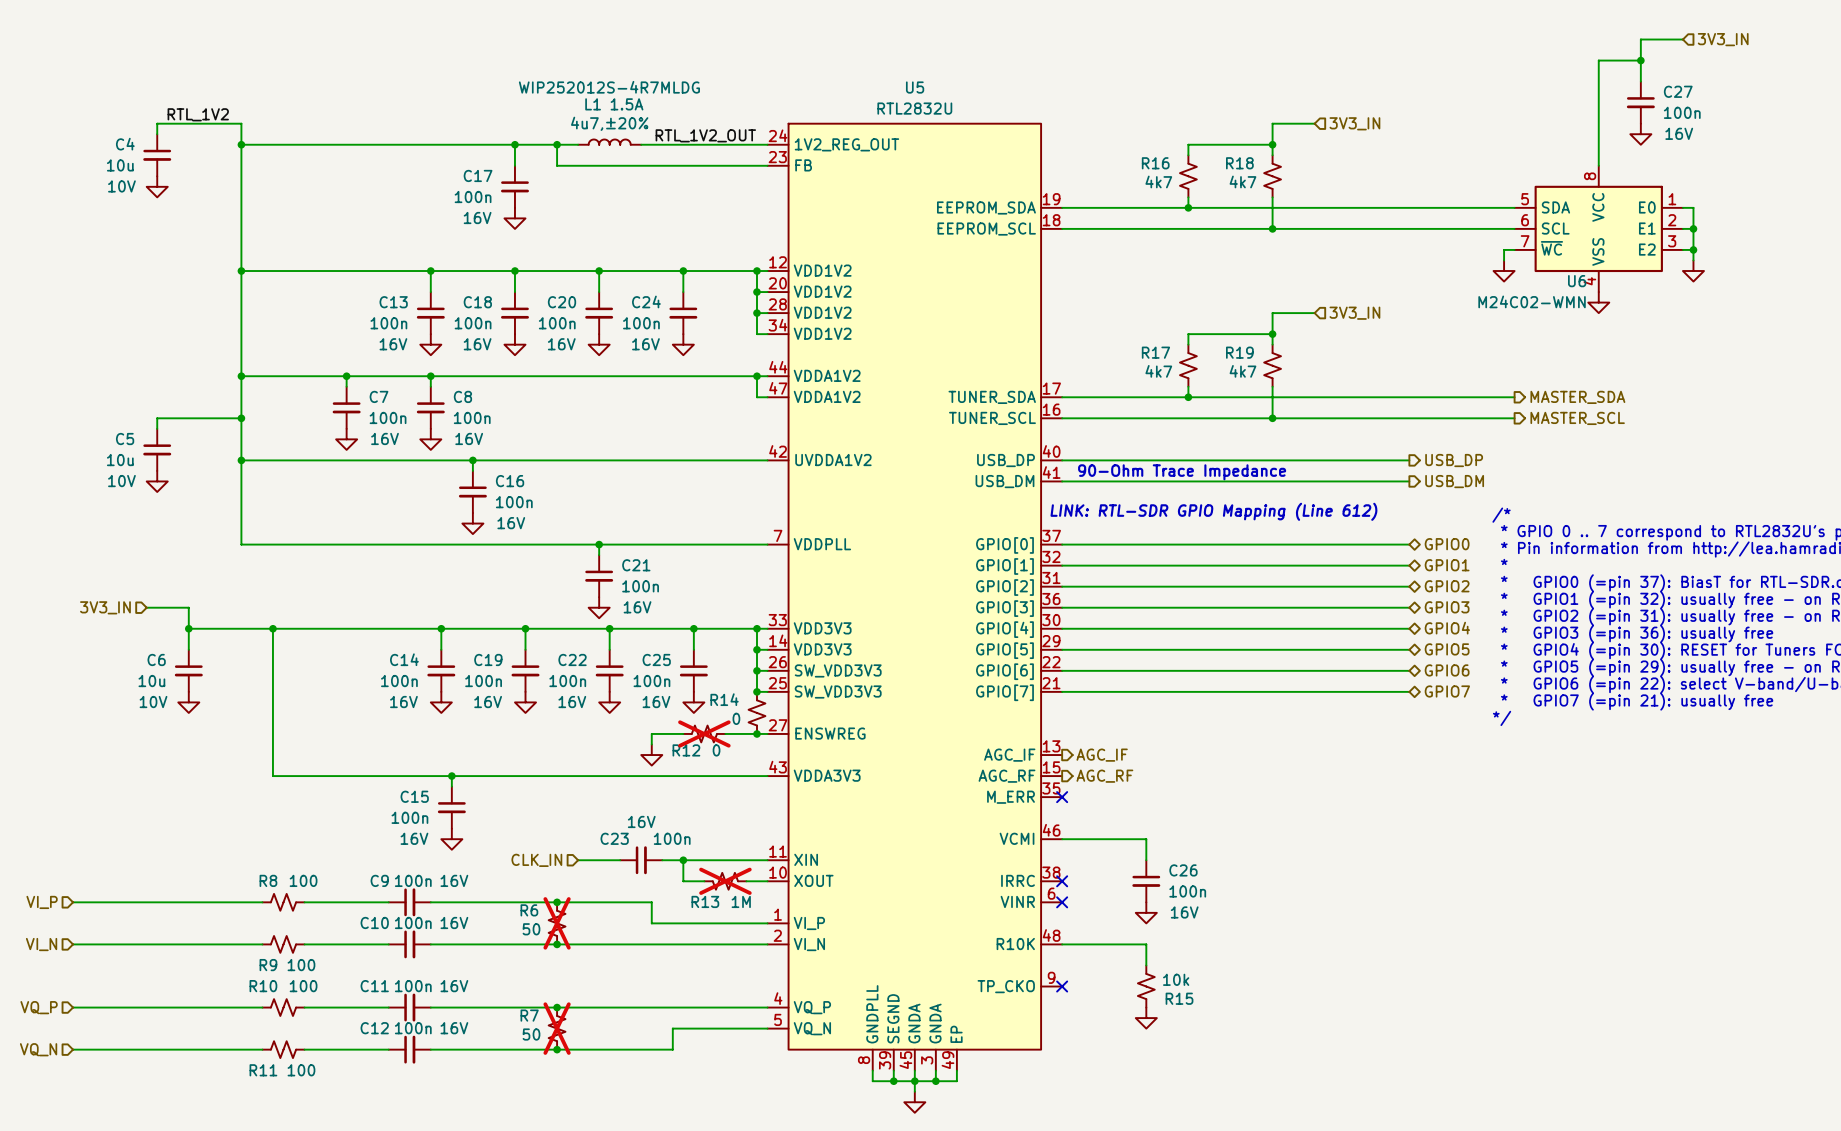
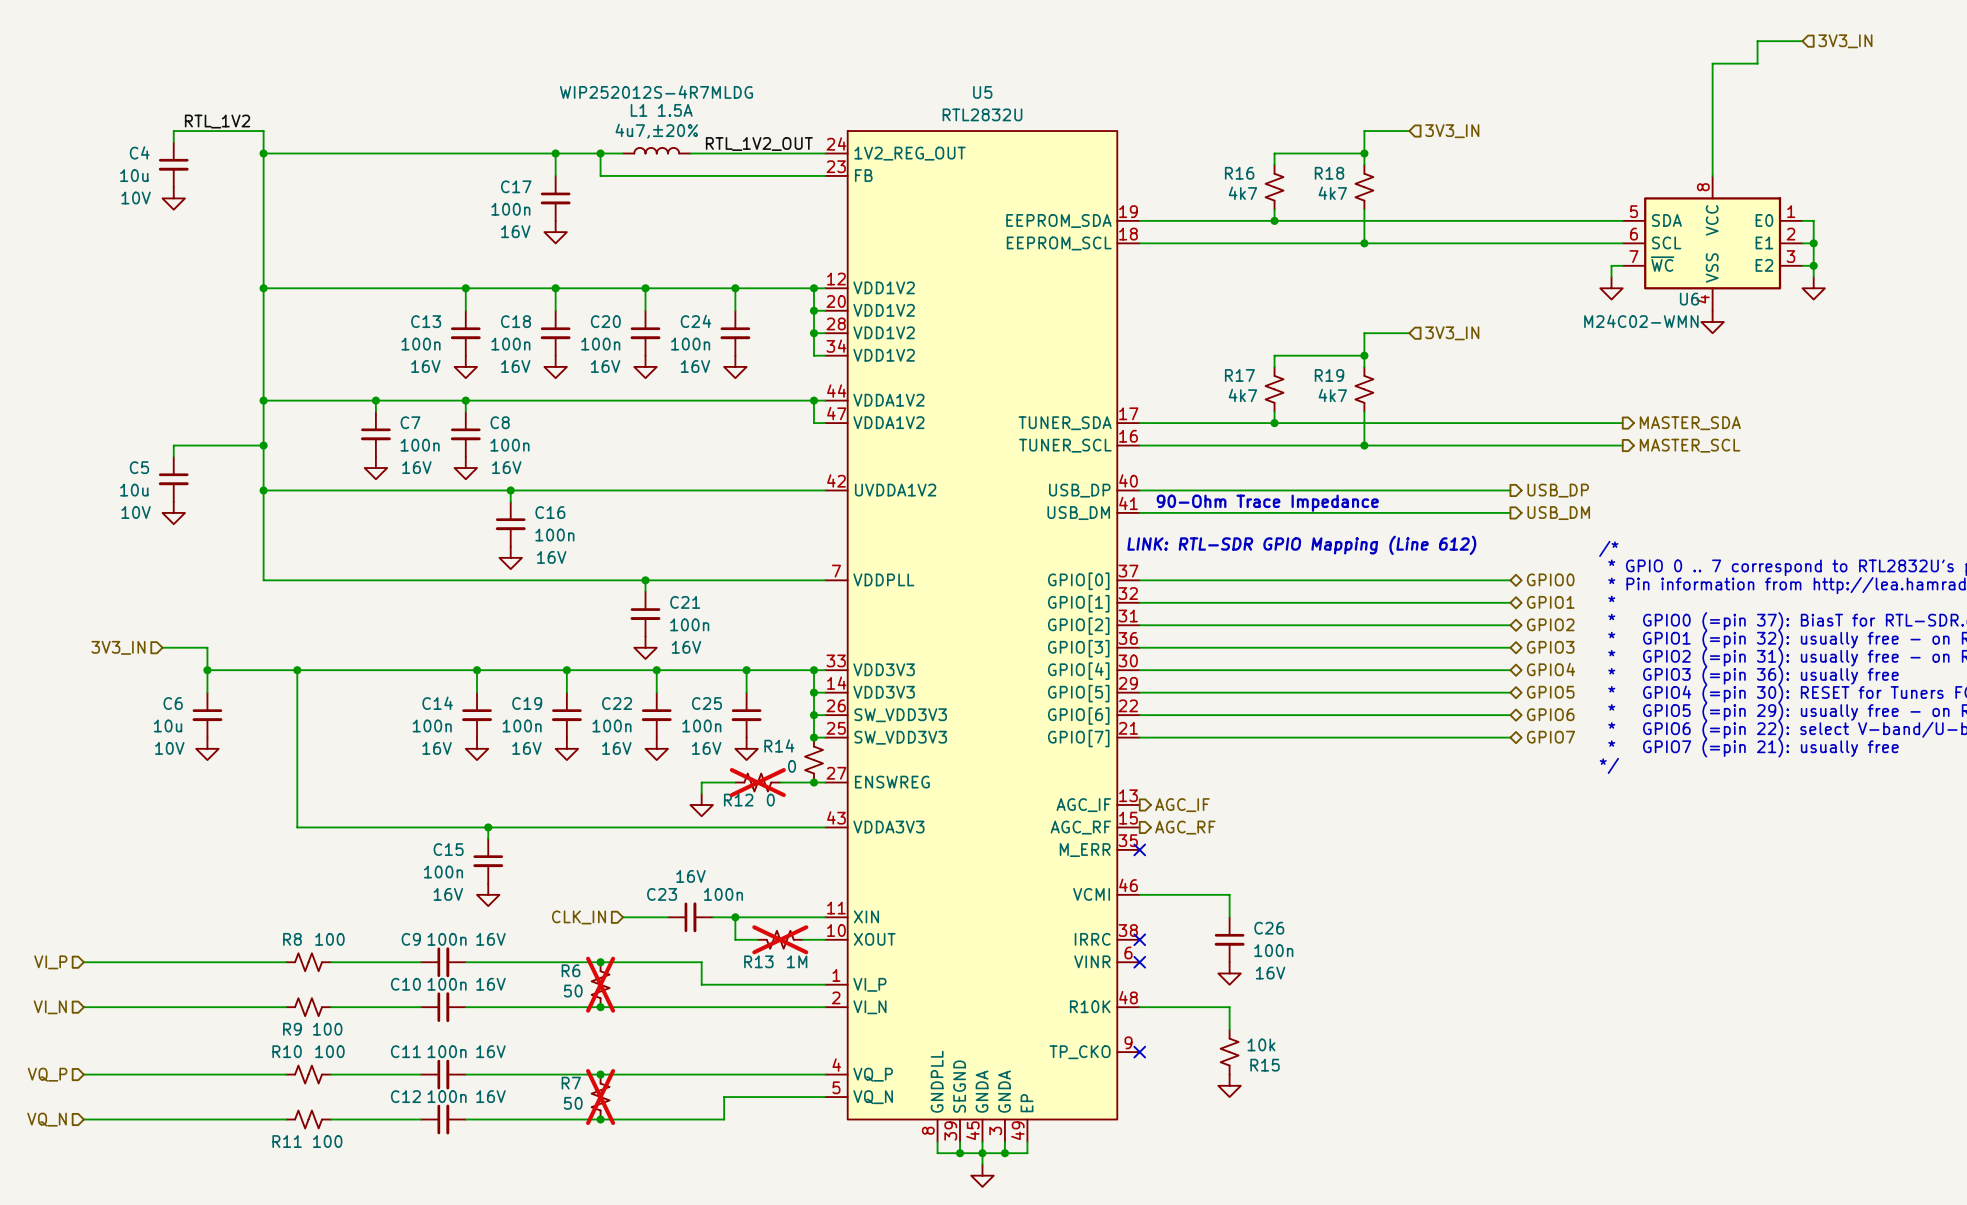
wire: (1640, 60) (1640, 81) -> none
junction: (1640, 60) -> none
C27: 100n (1640, 102) -> none
power symbol: (1640, 134) -> none

